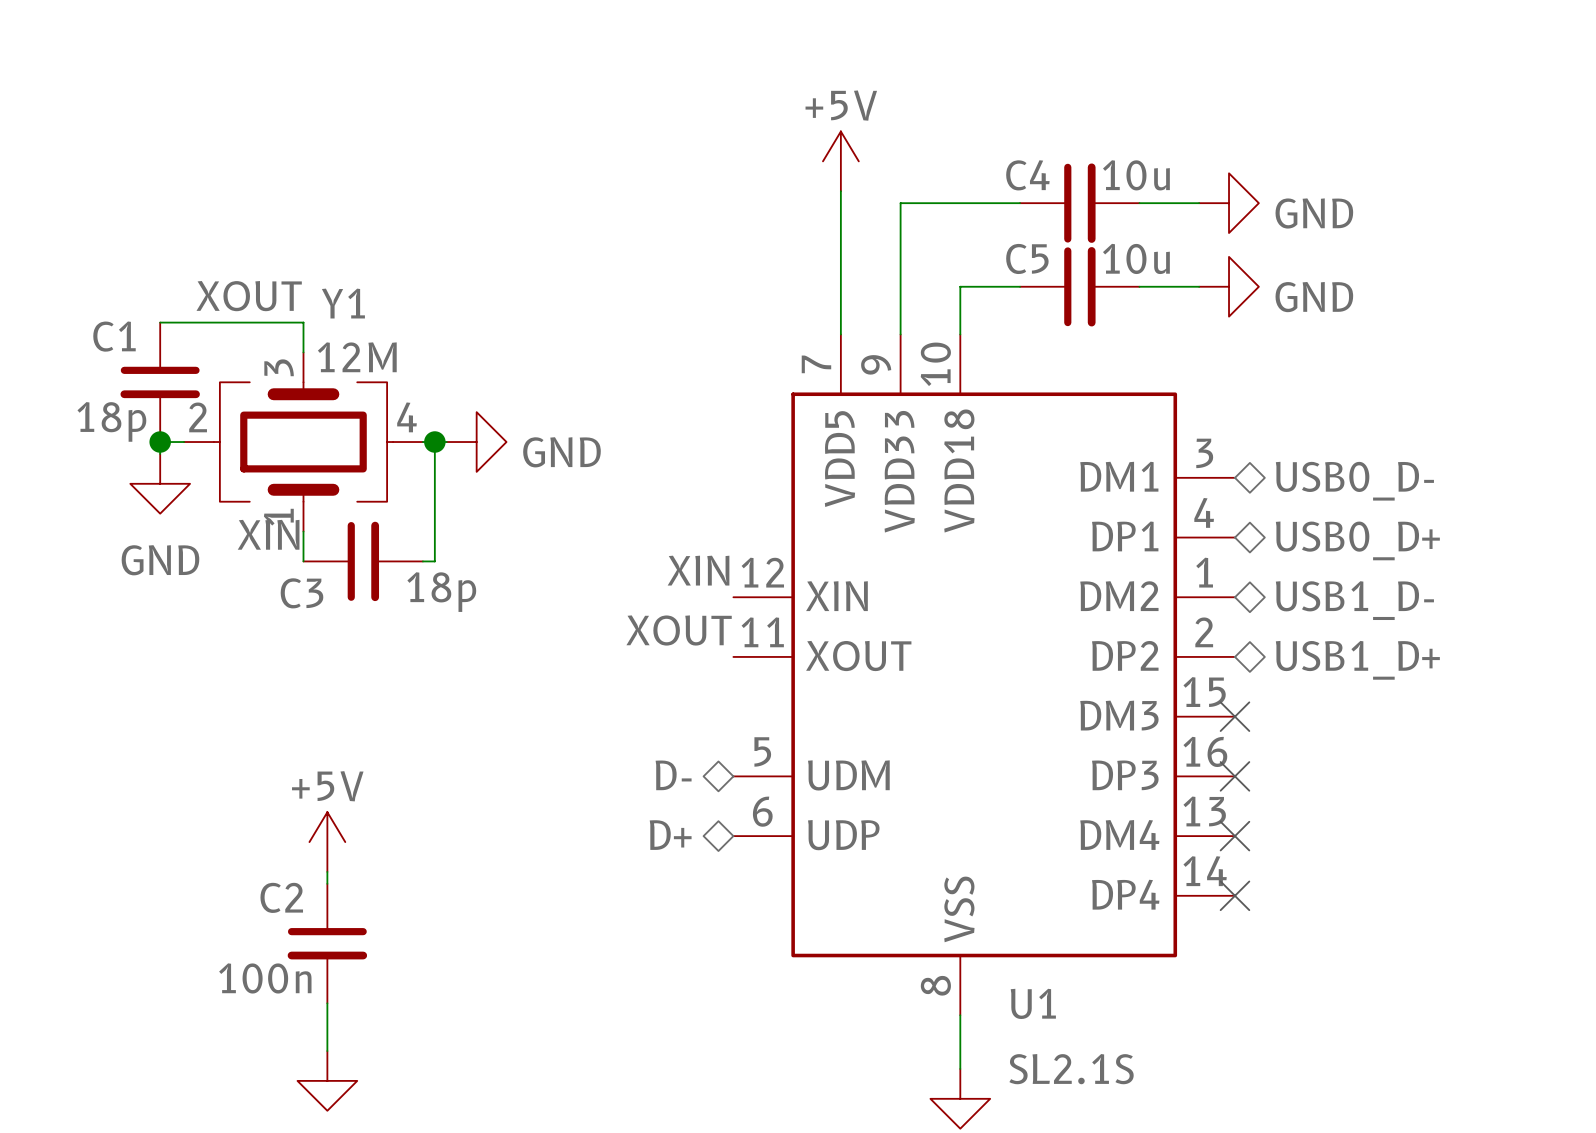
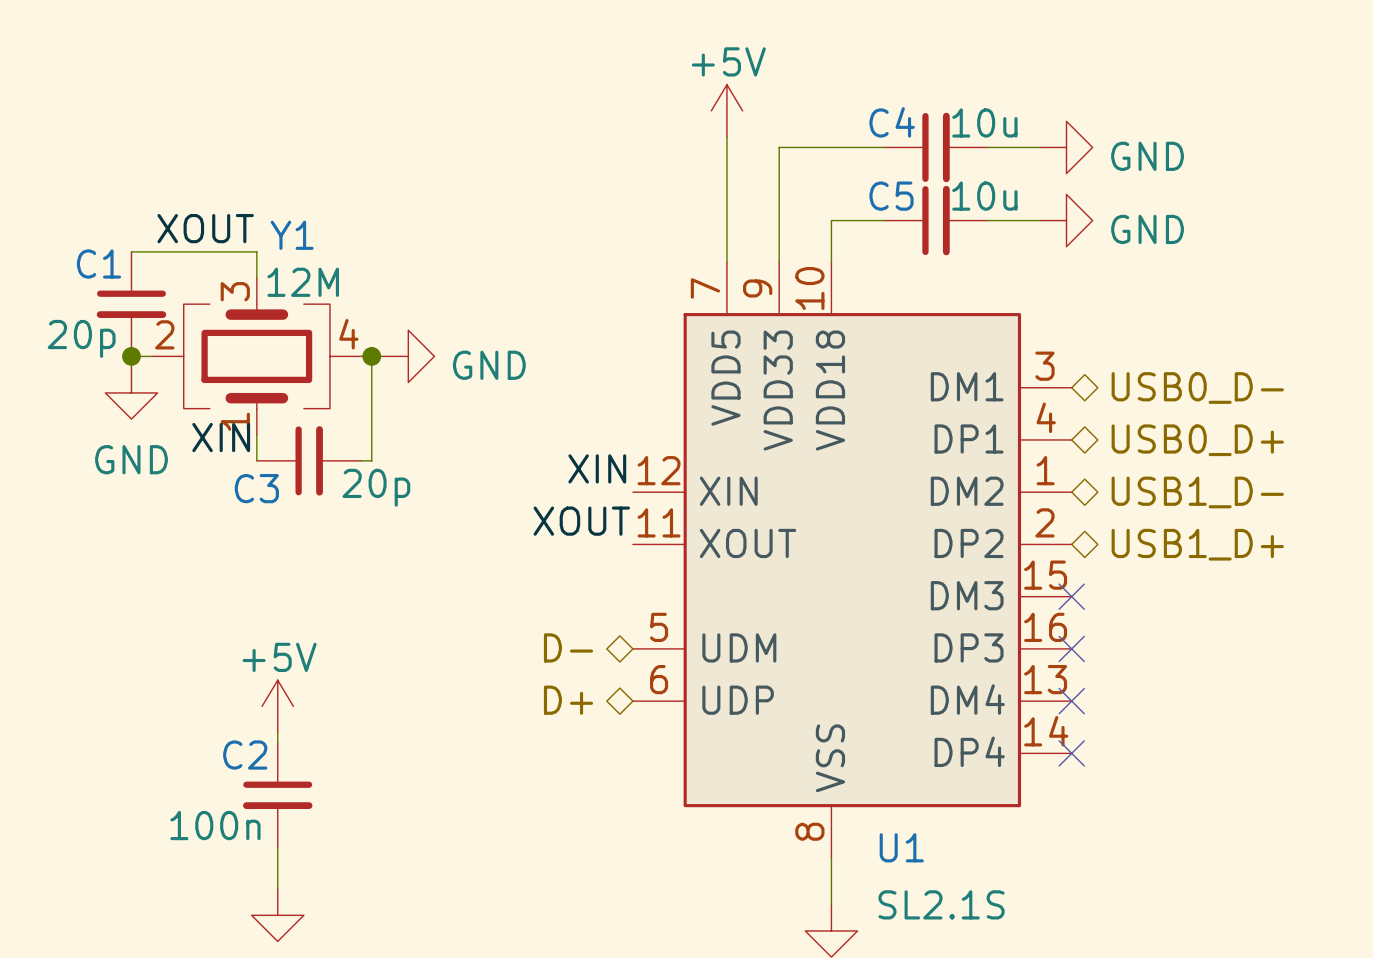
C1 value: 18p (111, 421) -> 20p (81, 338)
C3 value: 18p (441, 592) -> 20p (376, 487)

